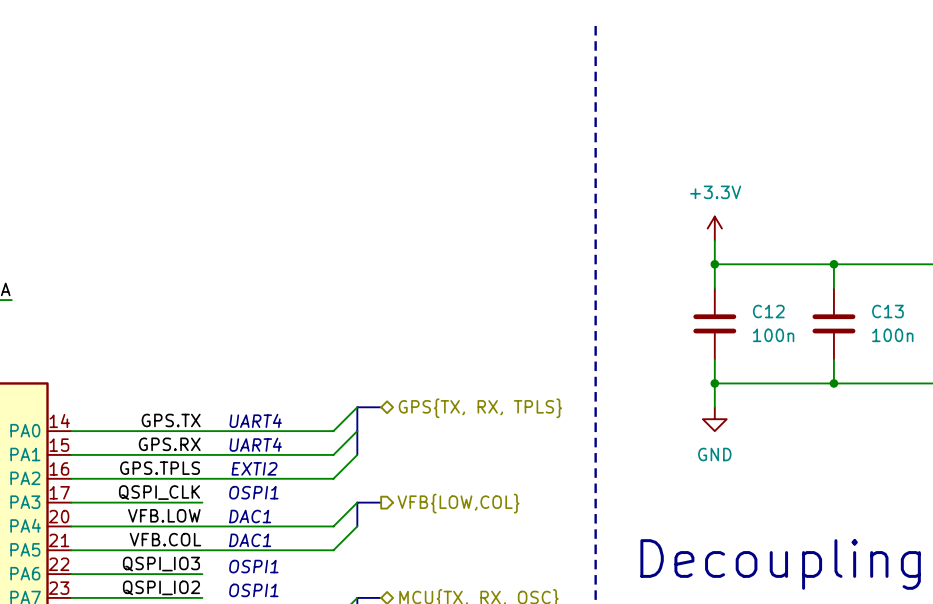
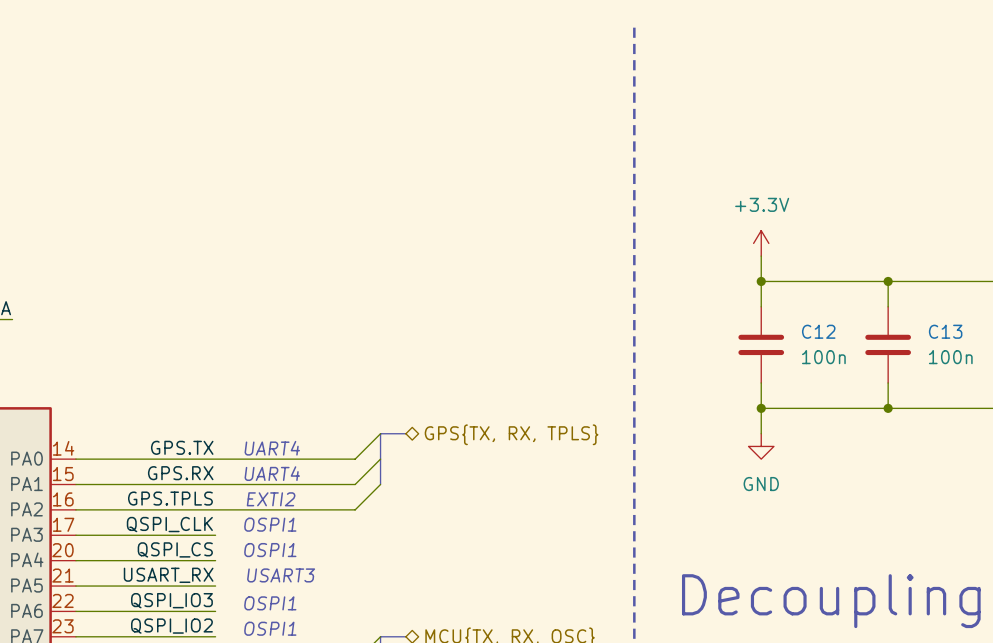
wire: (357, 502) (333, 526) (202, 526) -> none
bus: (381, 502) (357, 502) (357, 526) -> none
hierarchical label: VFB{LOW,COL} (458, 503) -> none
label: VFB.LOW (164, 515) -> QSPI_CS (175, 549)
text: DAC1 (250, 516) -> OSPI1 (270, 550)
wire: (357, 526) (333, 550) (202, 550) -> none
label: VFB.COL (165, 539) -> USART_RX (168, 575)
text: DAC1 (250, 540) -> USART3 (281, 575)

